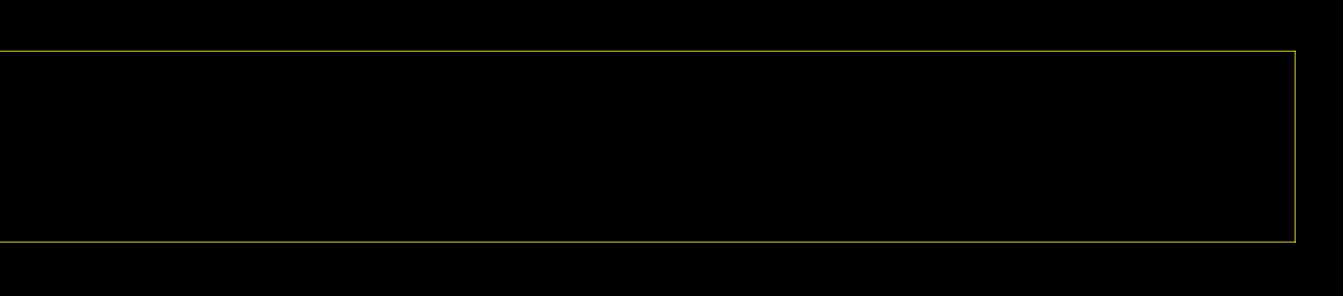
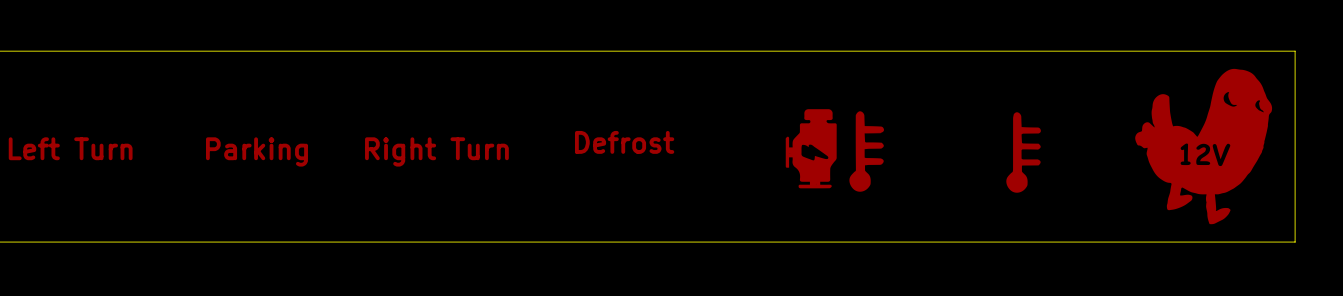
drawing: none -> [1135, 68, 1273, 225]
drawing: none -> [785, 109, 884, 192]
drawing: none -> [1006, 112, 1041, 193]
text: none -> Defrost (624, 142)
text: none -> Left Turn (70, 148)
text: none -> Parking (256, 151)
text: none -> Right Turn (436, 151)

